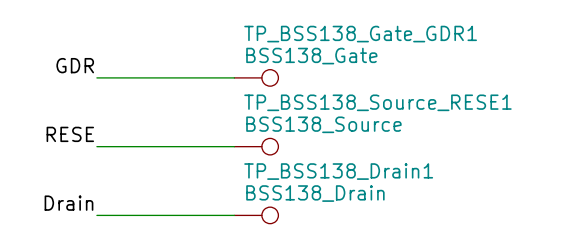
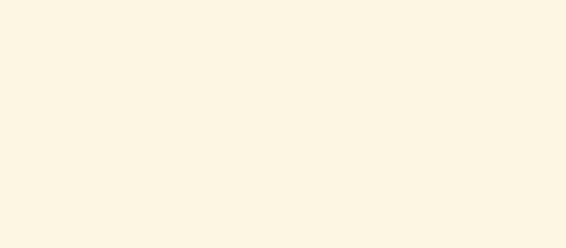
label: GDR (75, 65) -> none
wire: (96, 77) (234, 77) -> none
TP_BSS138_Gate_GDR1: BSS138_Gate (256, 77) -> none
label: RESE (70, 134) -> none
wire: (96, 146) (234, 146) -> none
TP_BSS138_Source_RESE1: BSS138_Source (256, 146) -> none
label: Drain (68, 203) -> none
wire: (96, 215) (234, 215) -> none
TP_BSS138_Drain1: BSS138_Drain (256, 215) -> none

